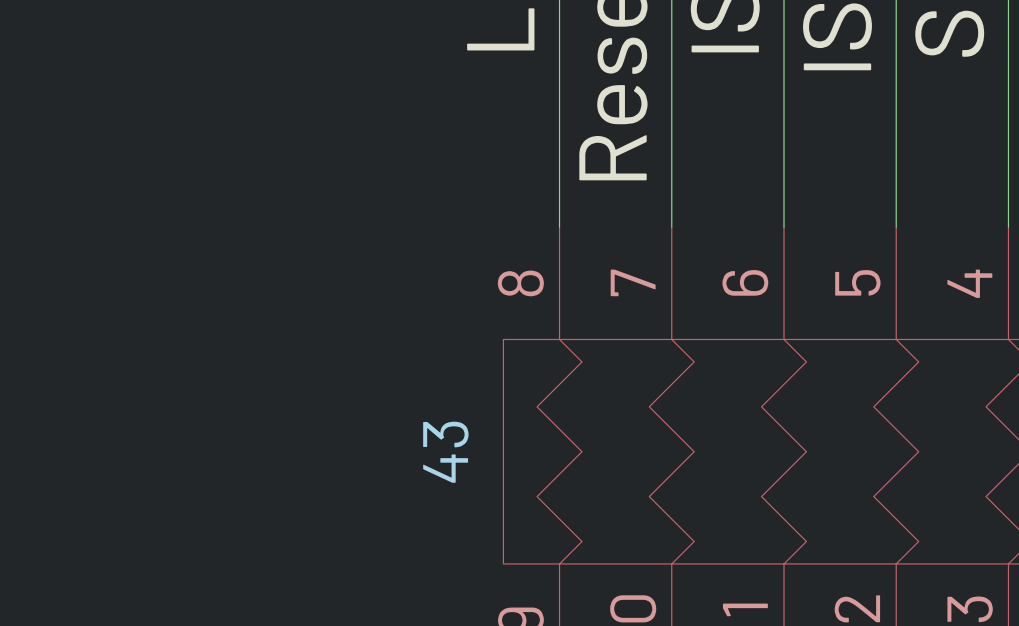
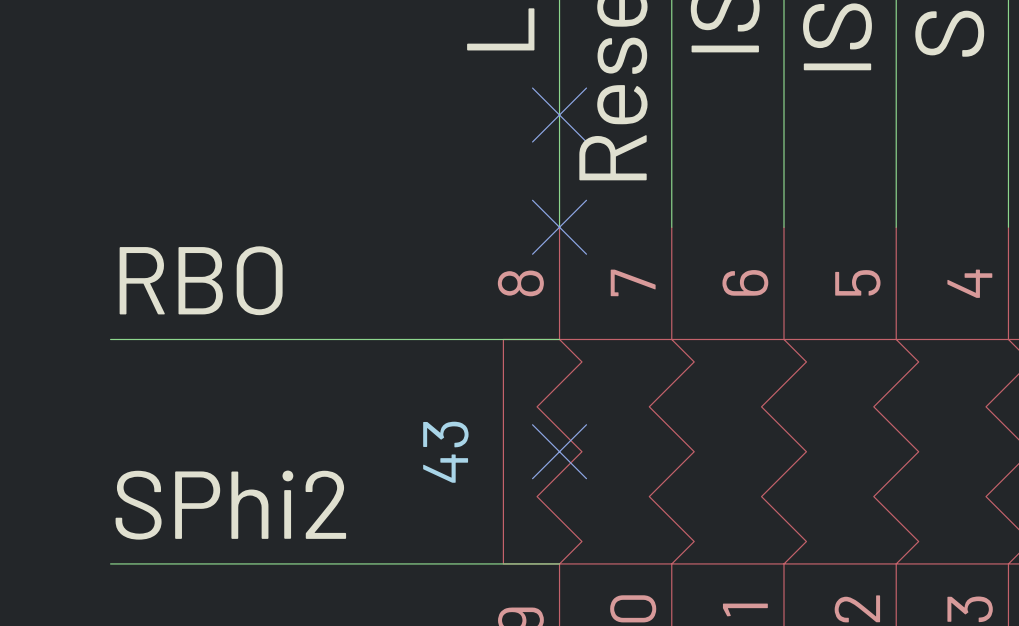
no-connect mark: none -> (559, 115)
no-connect mark: none -> (559, 227)
label: none -> RBO (201, 280)
wire: none -> (110, 339) (559, 339)
no-connect mark: none -> (559, 451)
label: none -> SPhi2 (230, 505)
wire: none -> (110, 563) (559, 563)

